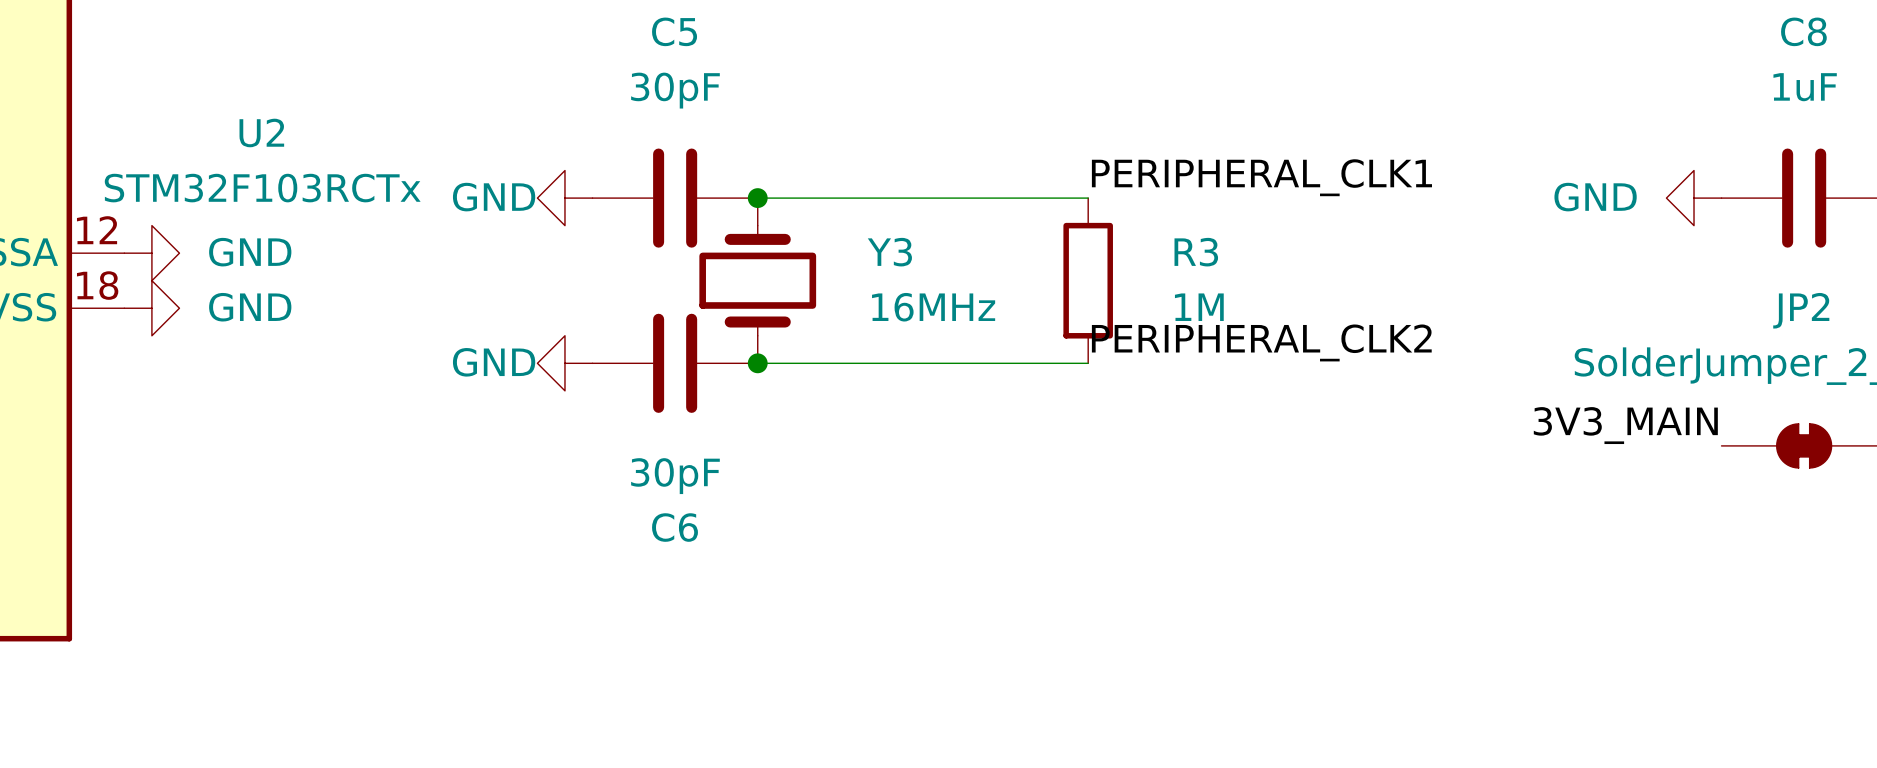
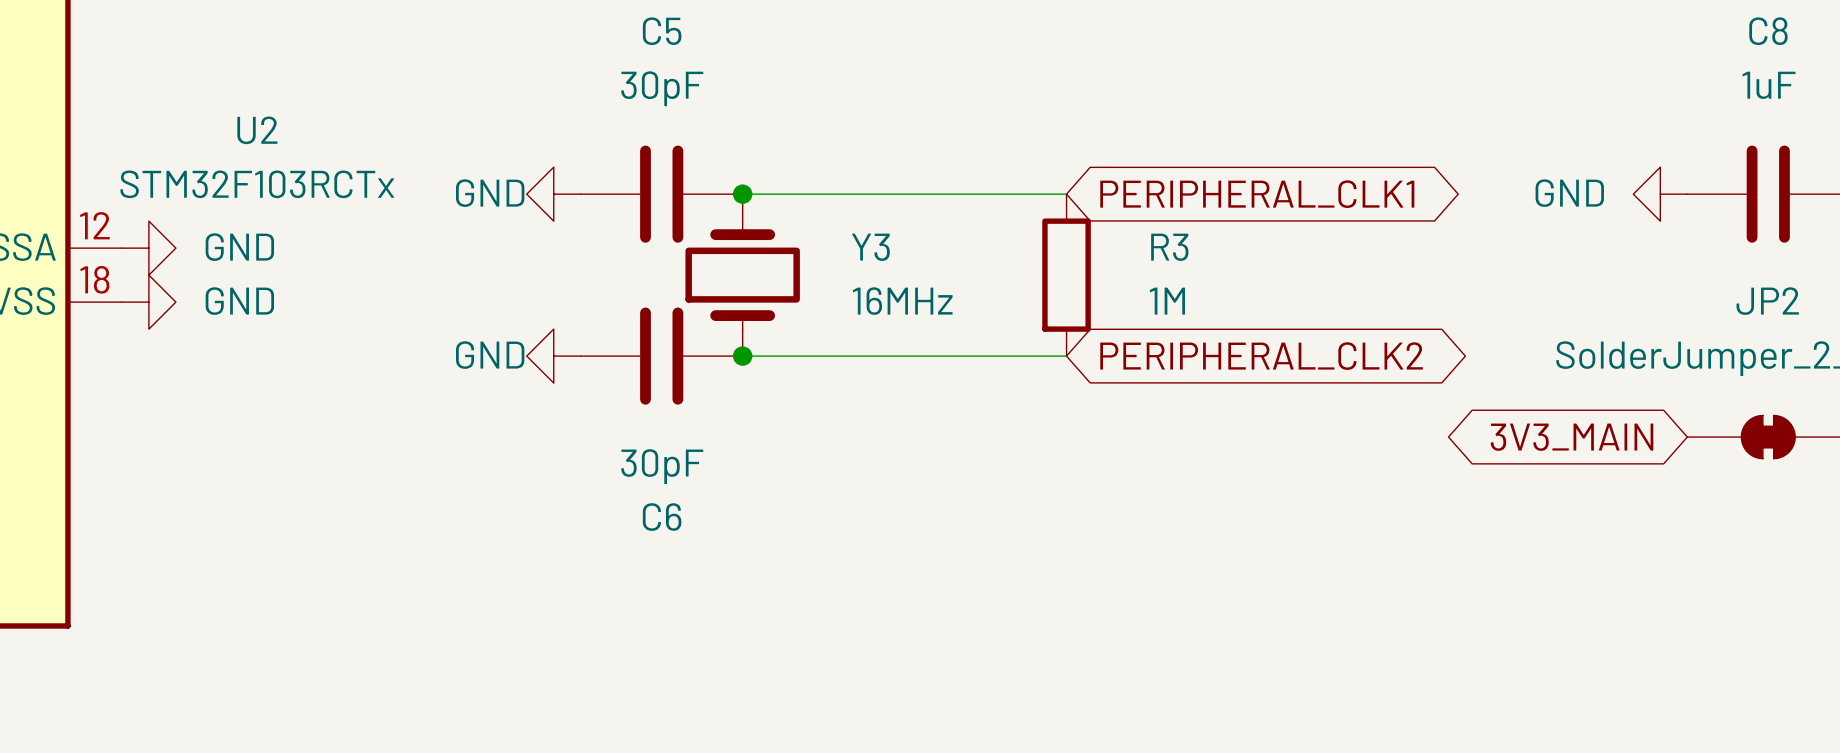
label: PERIPHERAL_CLK1 (1261, 177) -> none
global label: none -> PERIPHERAL_CLK1 (1257, 194)
label: PERIPHERAL_CLK2 (1261, 342) -> none
global label: none -> PERIPHERAL_CLK2 (1261, 356)
label: 3V3_MAIN (1625, 425) -> none
global label: none -> 3V3_MAIN (1572, 437)

